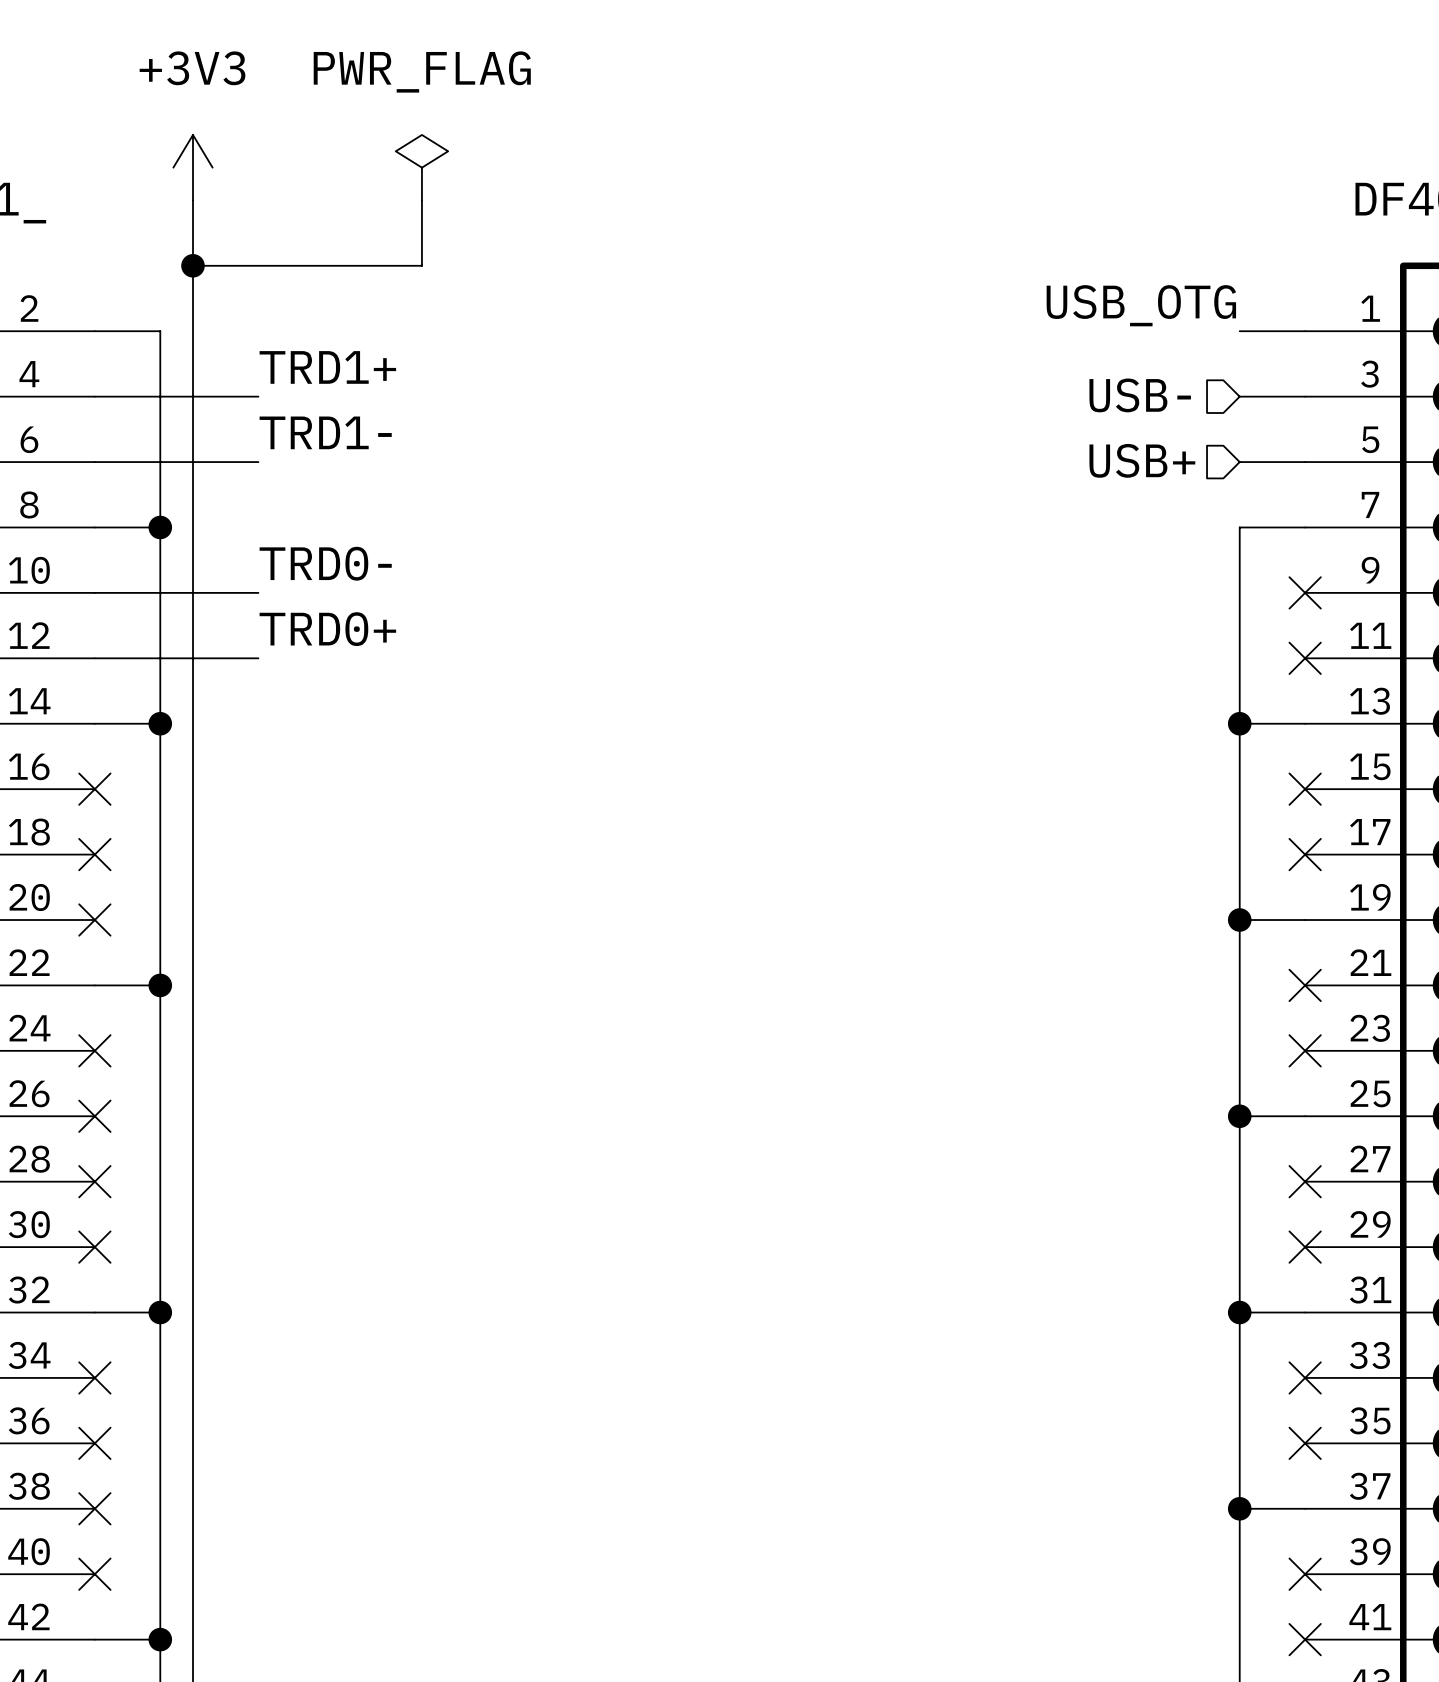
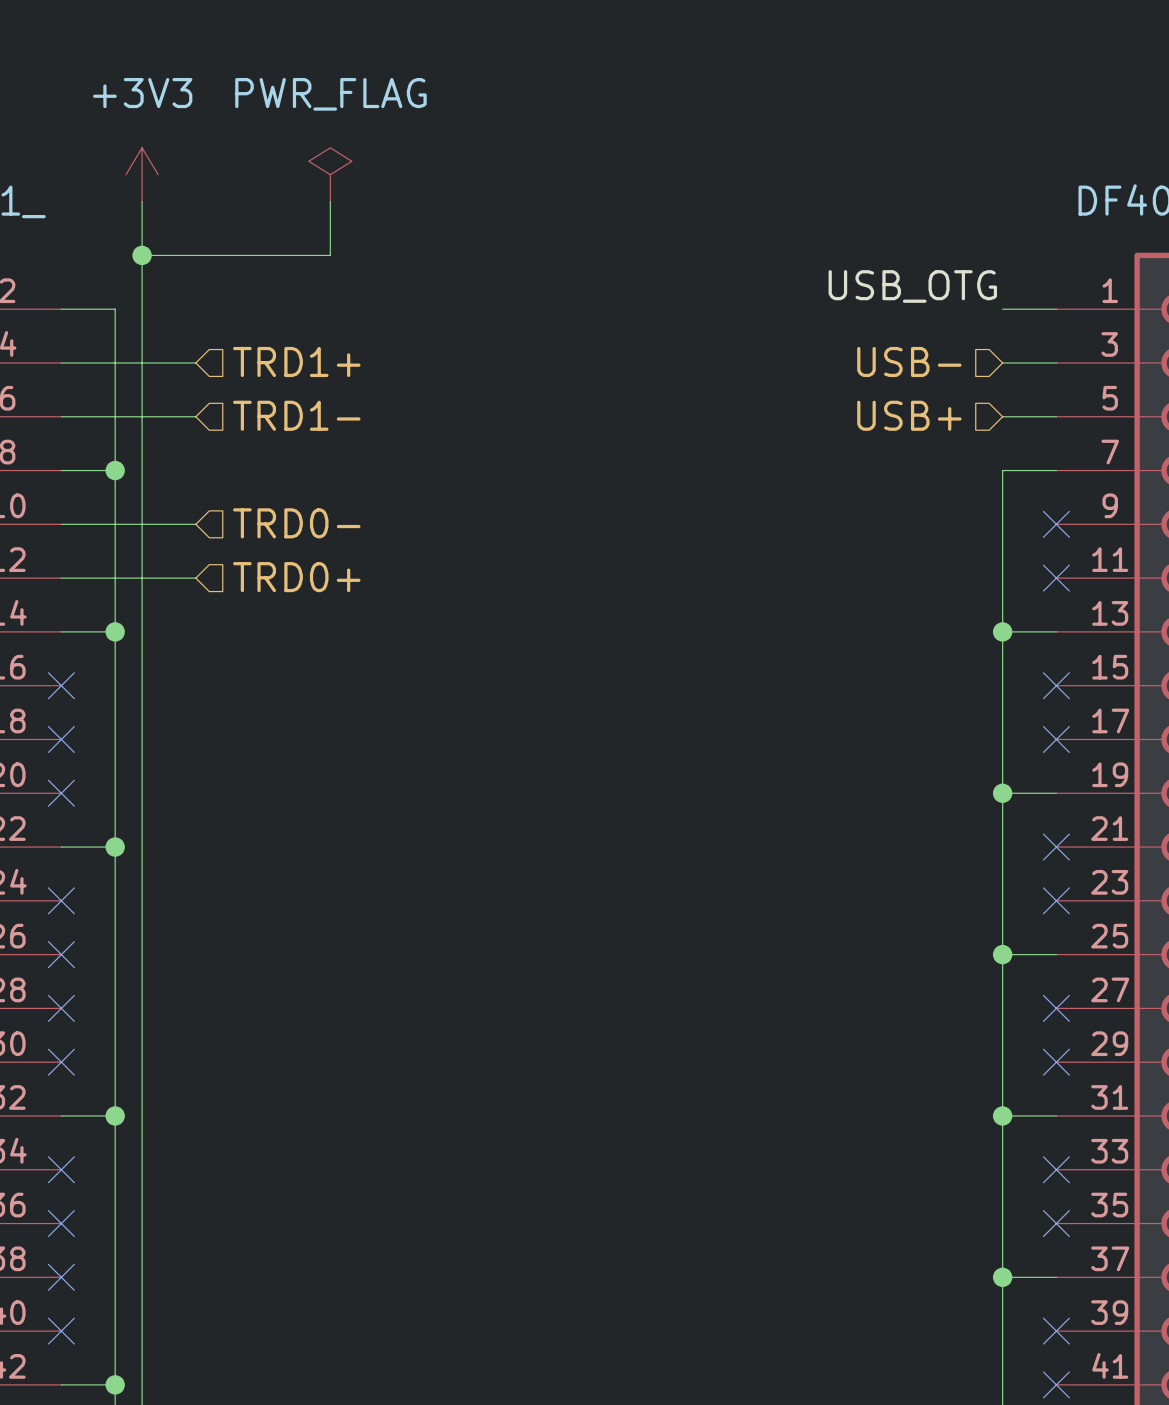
label: TRD1+ (327, 367) -> none
hierarchical label: none -> TRD1+ (296, 361)
label: TRD1- (325, 432) -> none
hierarchical label: none -> TRD1- (296, 415)
label: TRD0- (325, 563) -> none
hierarchical label: none -> TRD0- (296, 523)
label: TRD0+ (327, 629) -> none
hierarchical label: none -> TRD0+ (296, 577)

